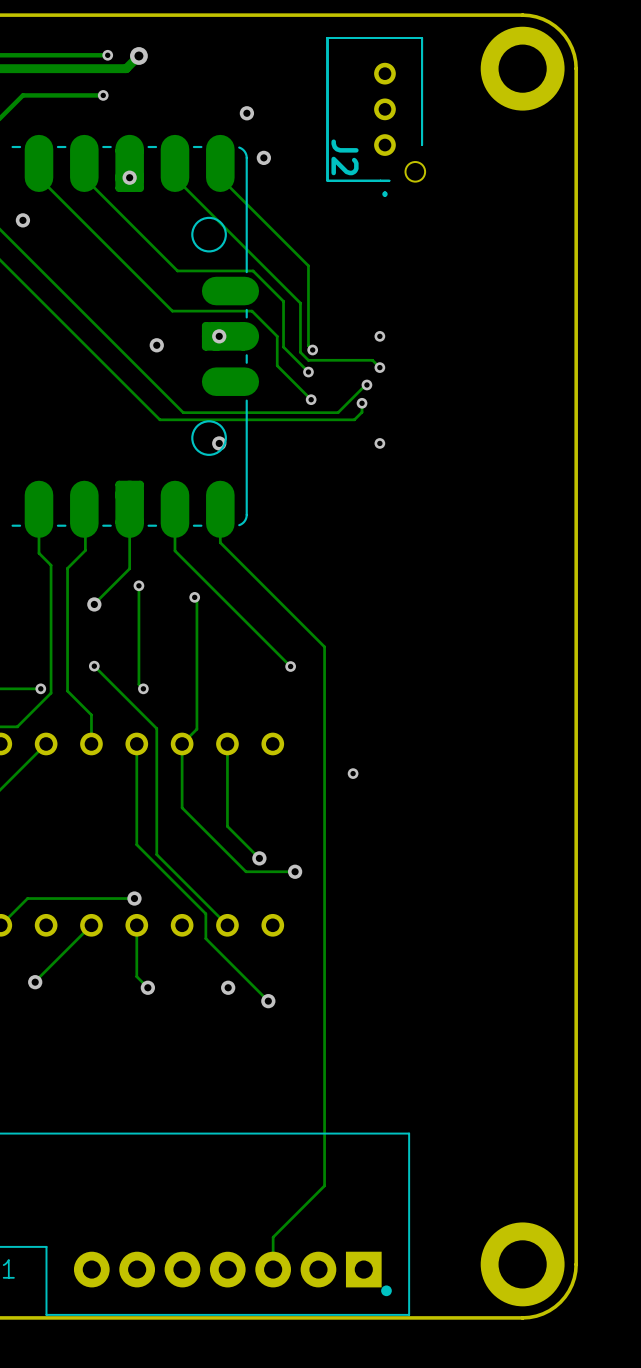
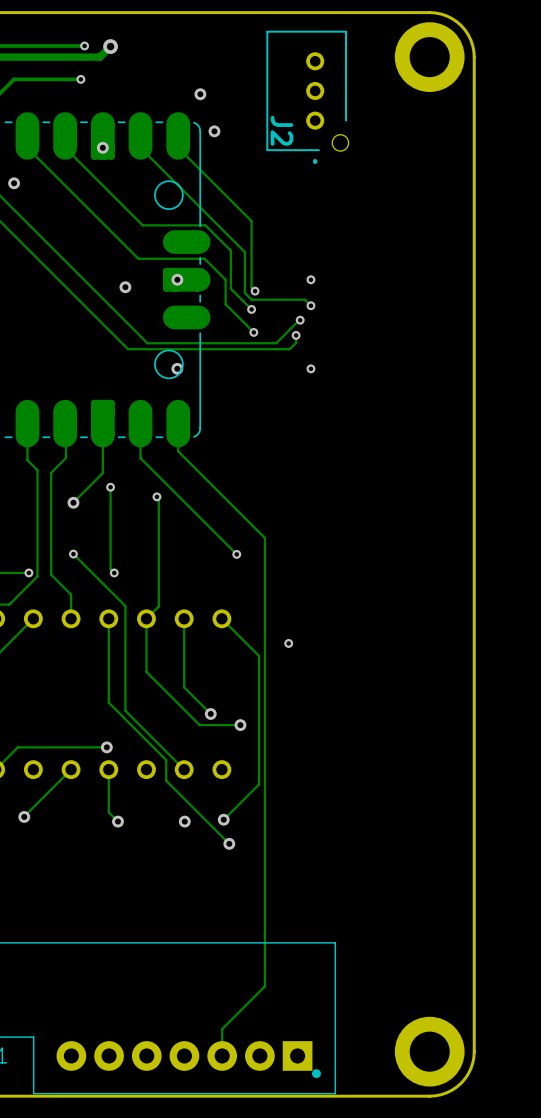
track: none -> (221, 618) (259, 655) (259, 784) (223, 819)
via: none -> (223, 819)
track: none -> (218, 832) (229, 843)
via: (268, 1001) -> none
via: none -> (229, 843)

